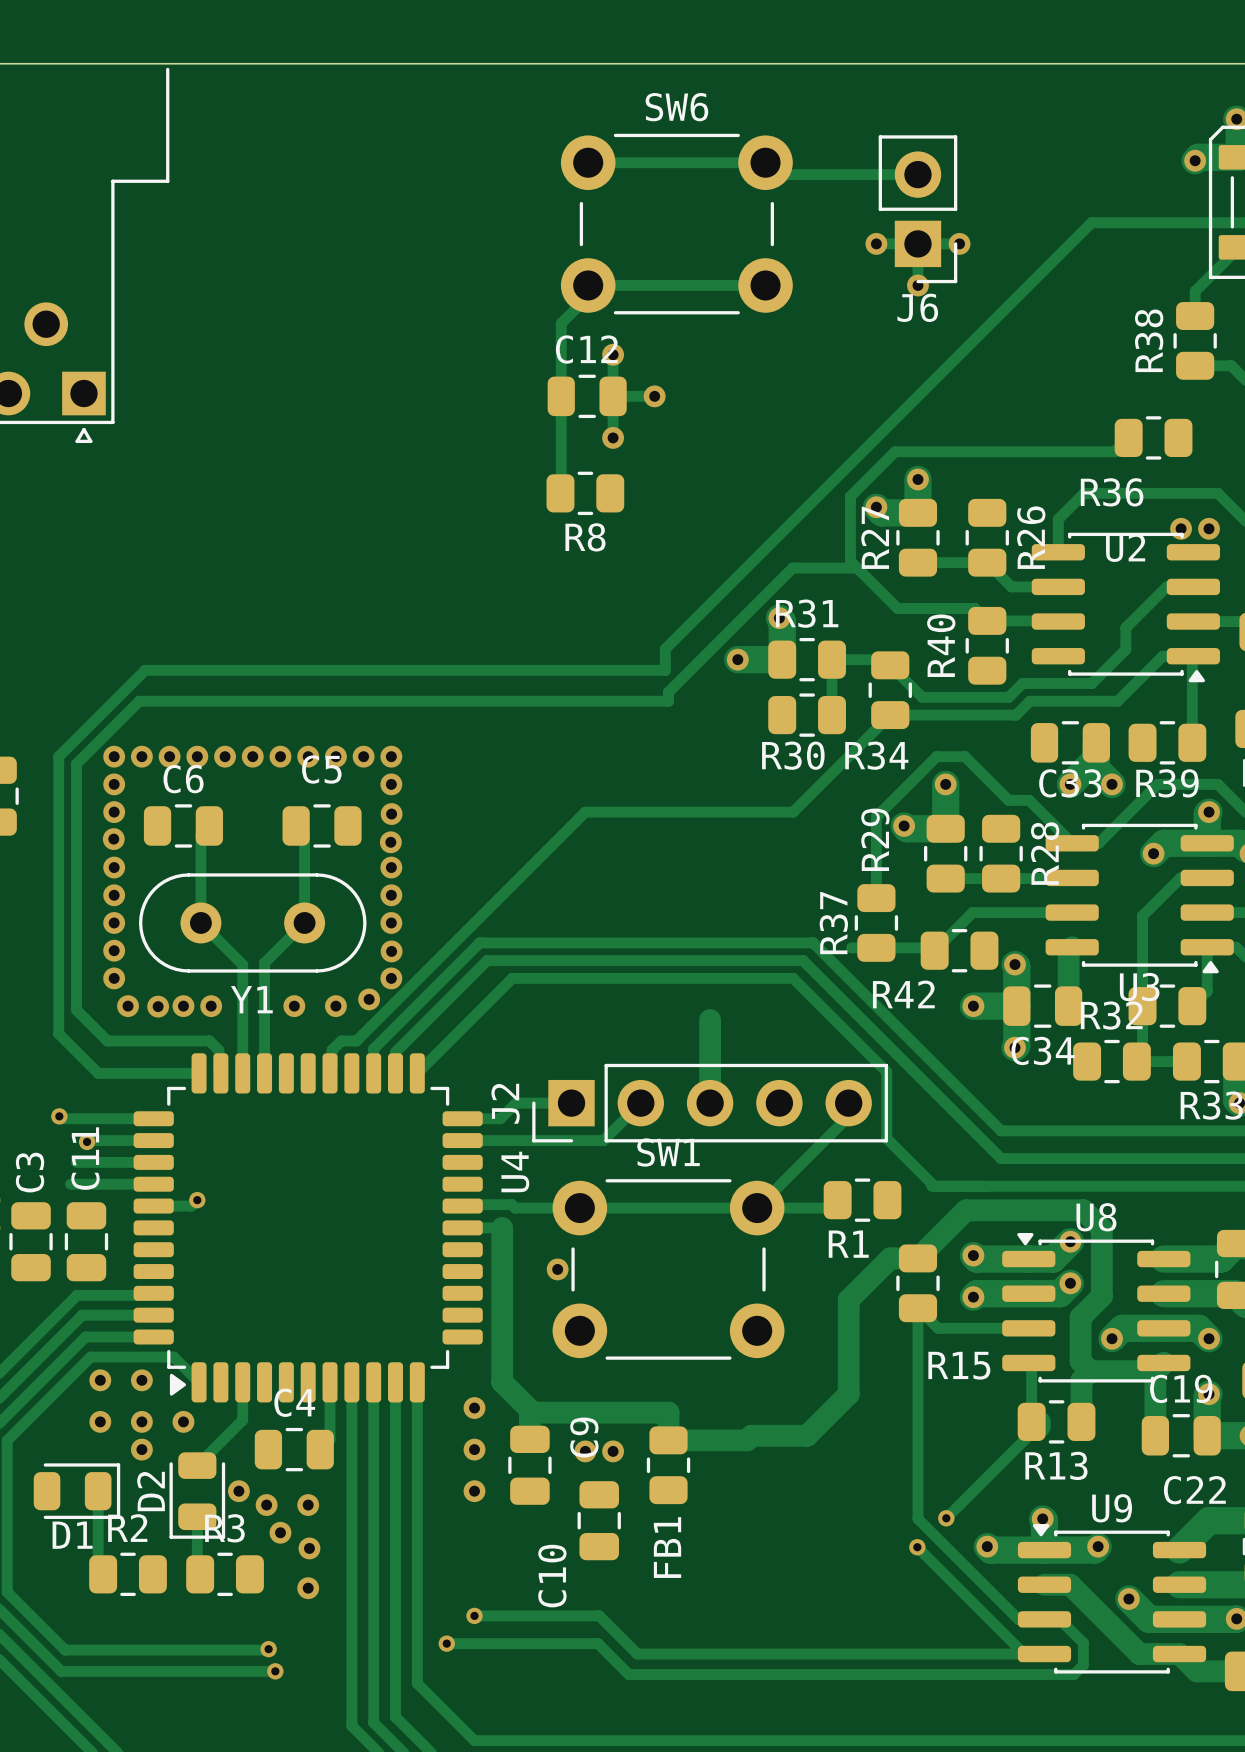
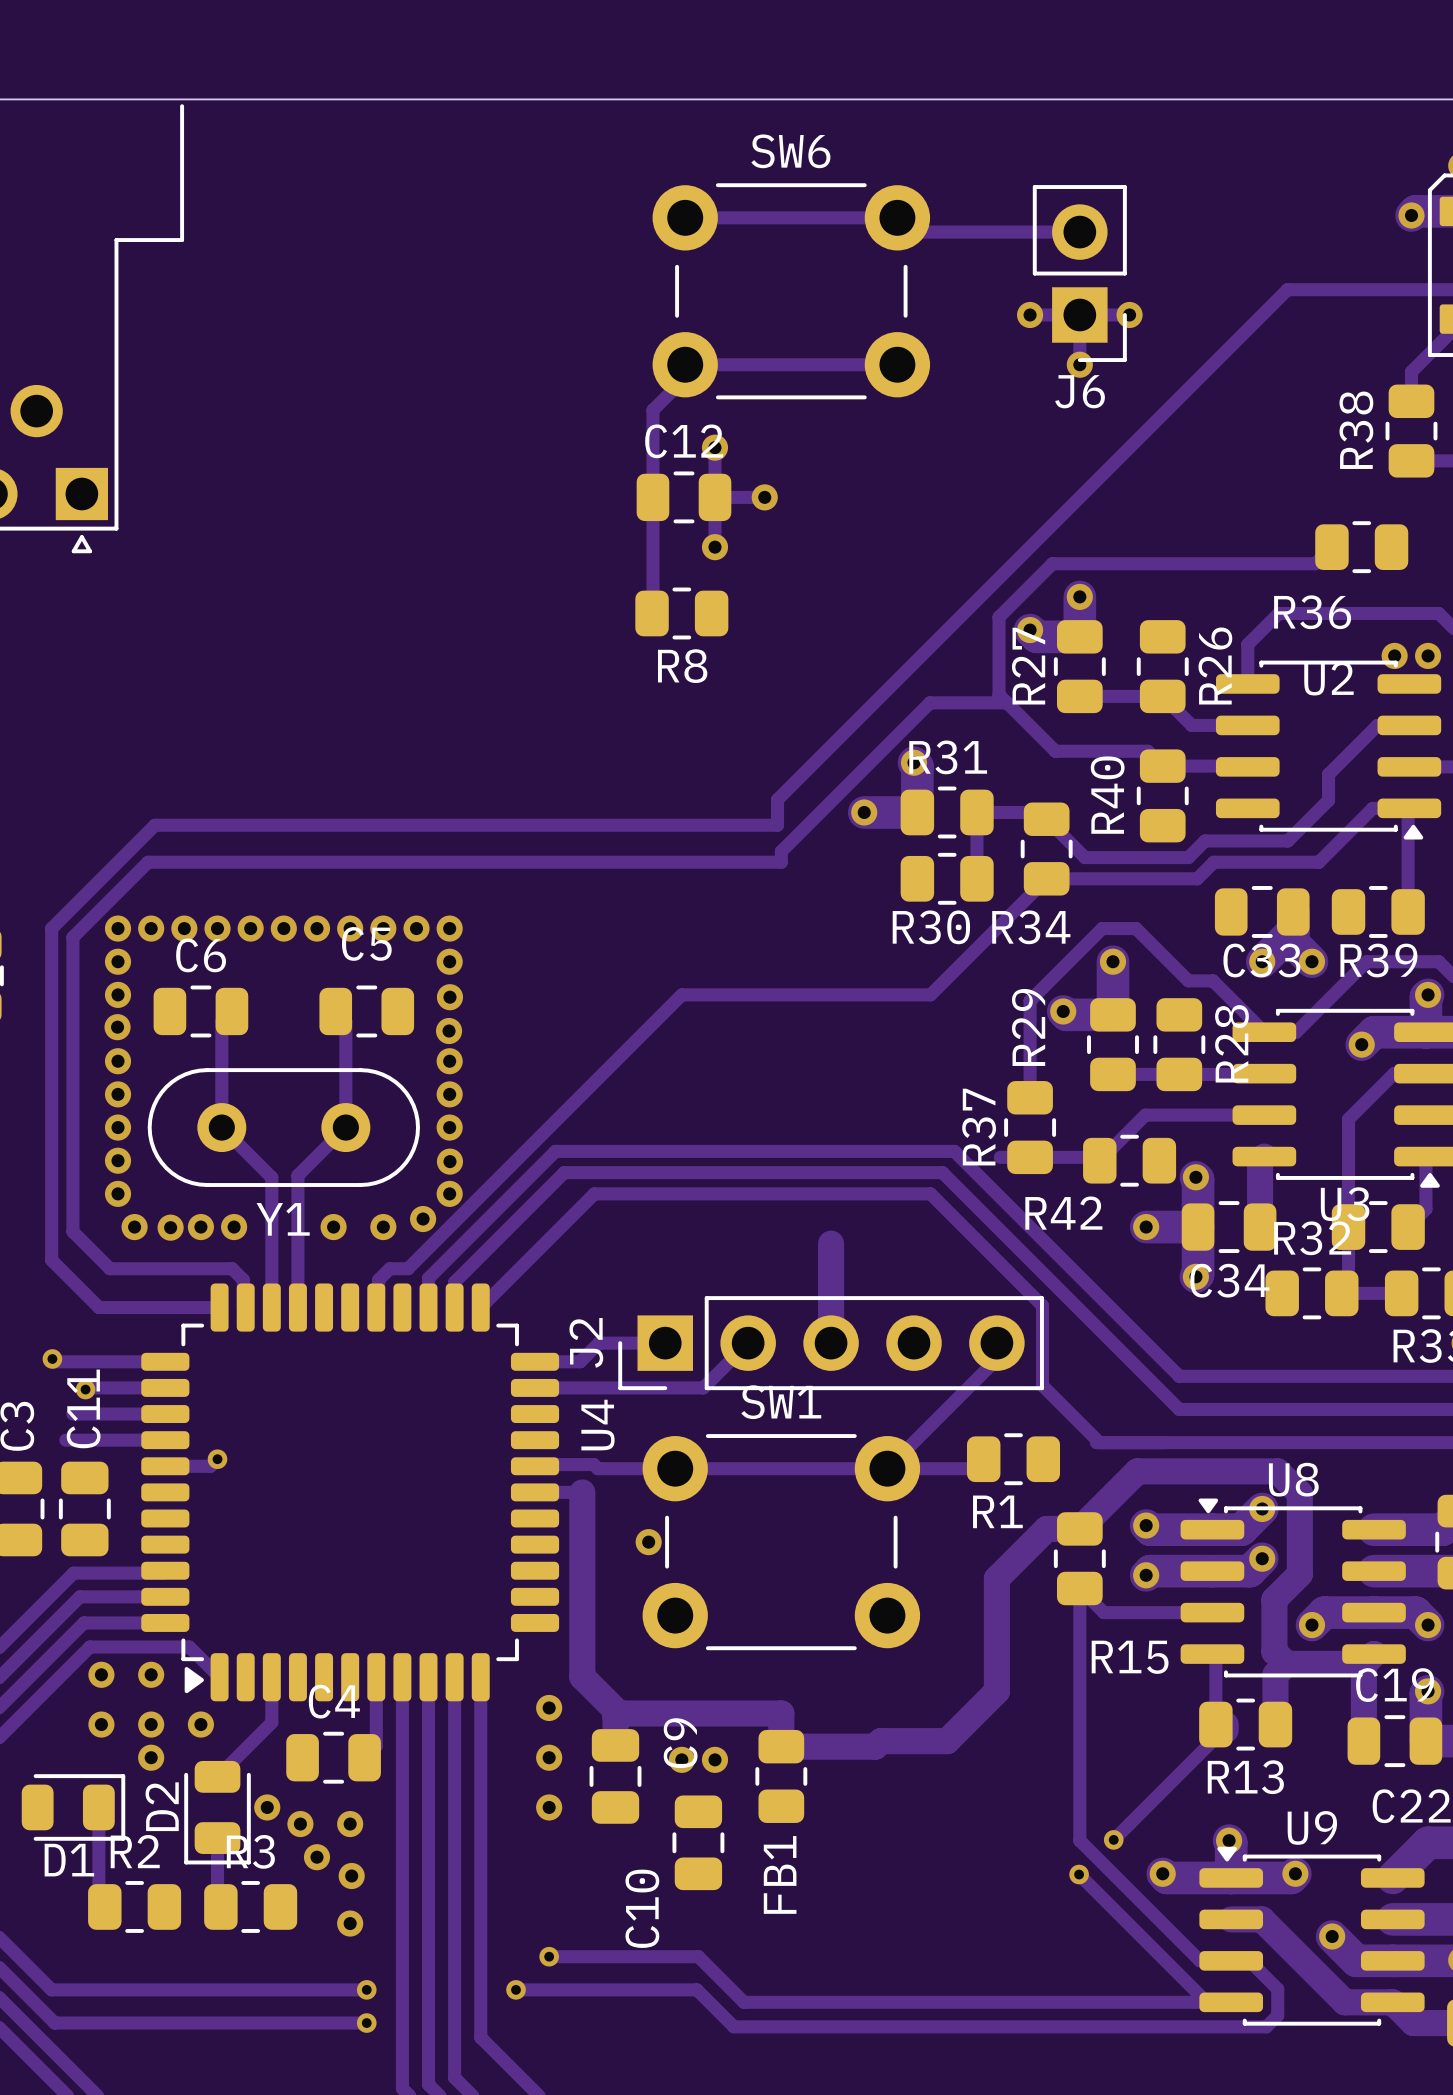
track: (58, 1643) (65, 1650) (268, 1649) -> (51, 1989) (366, 1989)
via: none -> (366, 1989)
via: (268, 1649) -> none
track: none -> (310, 2023) (366, 2023)
via: (275, 1671) -> none
via: none -> (366, 2023)

